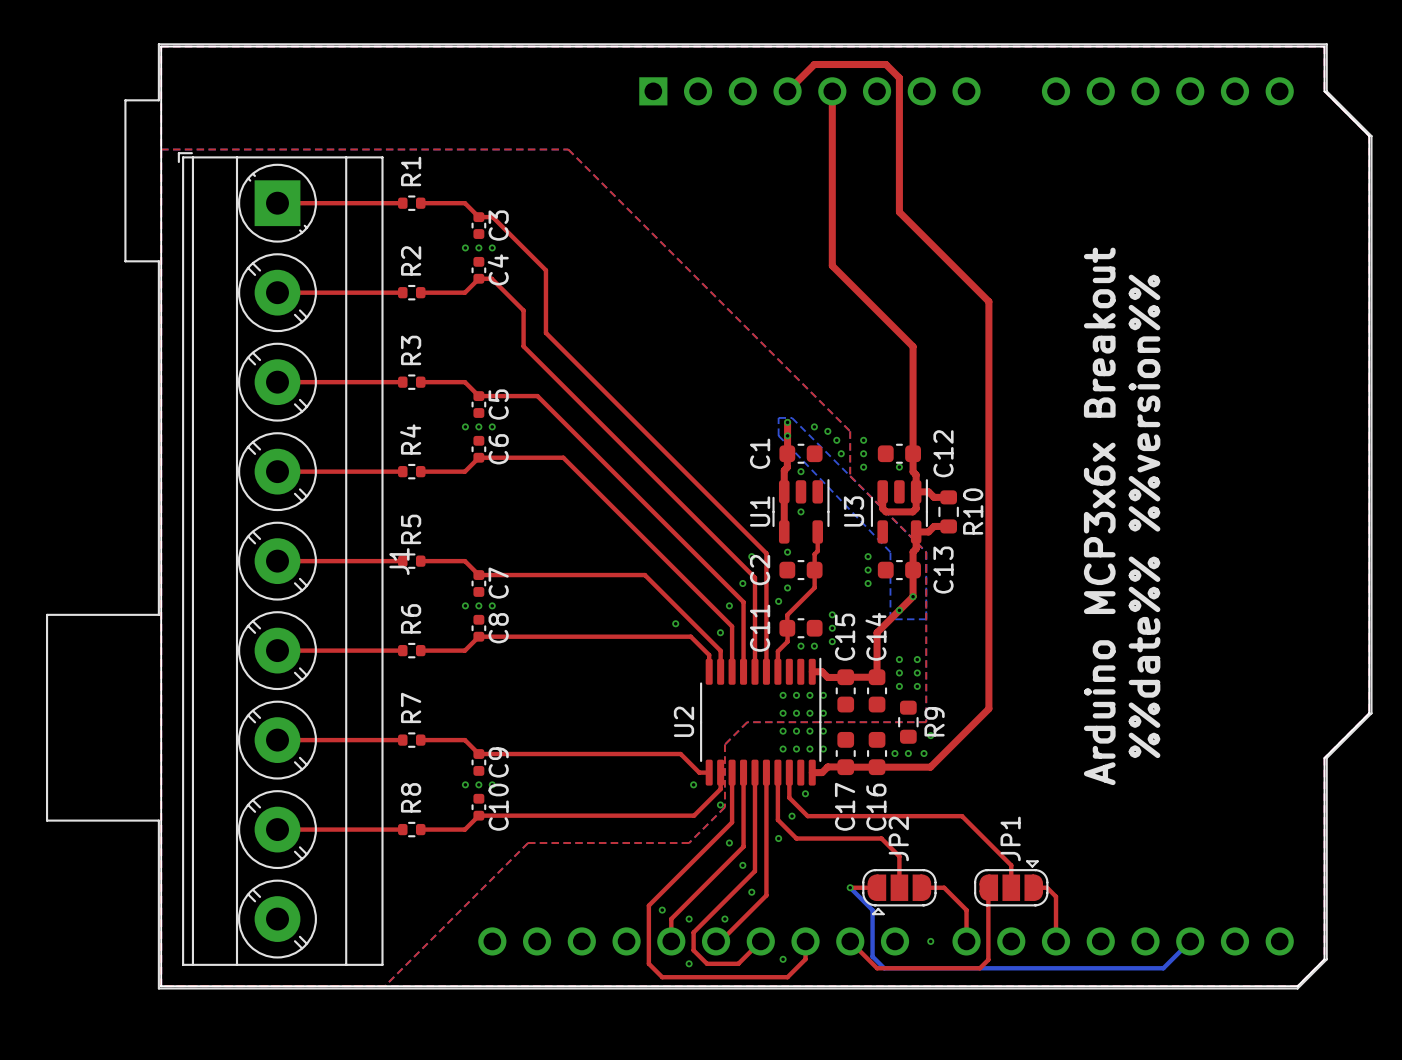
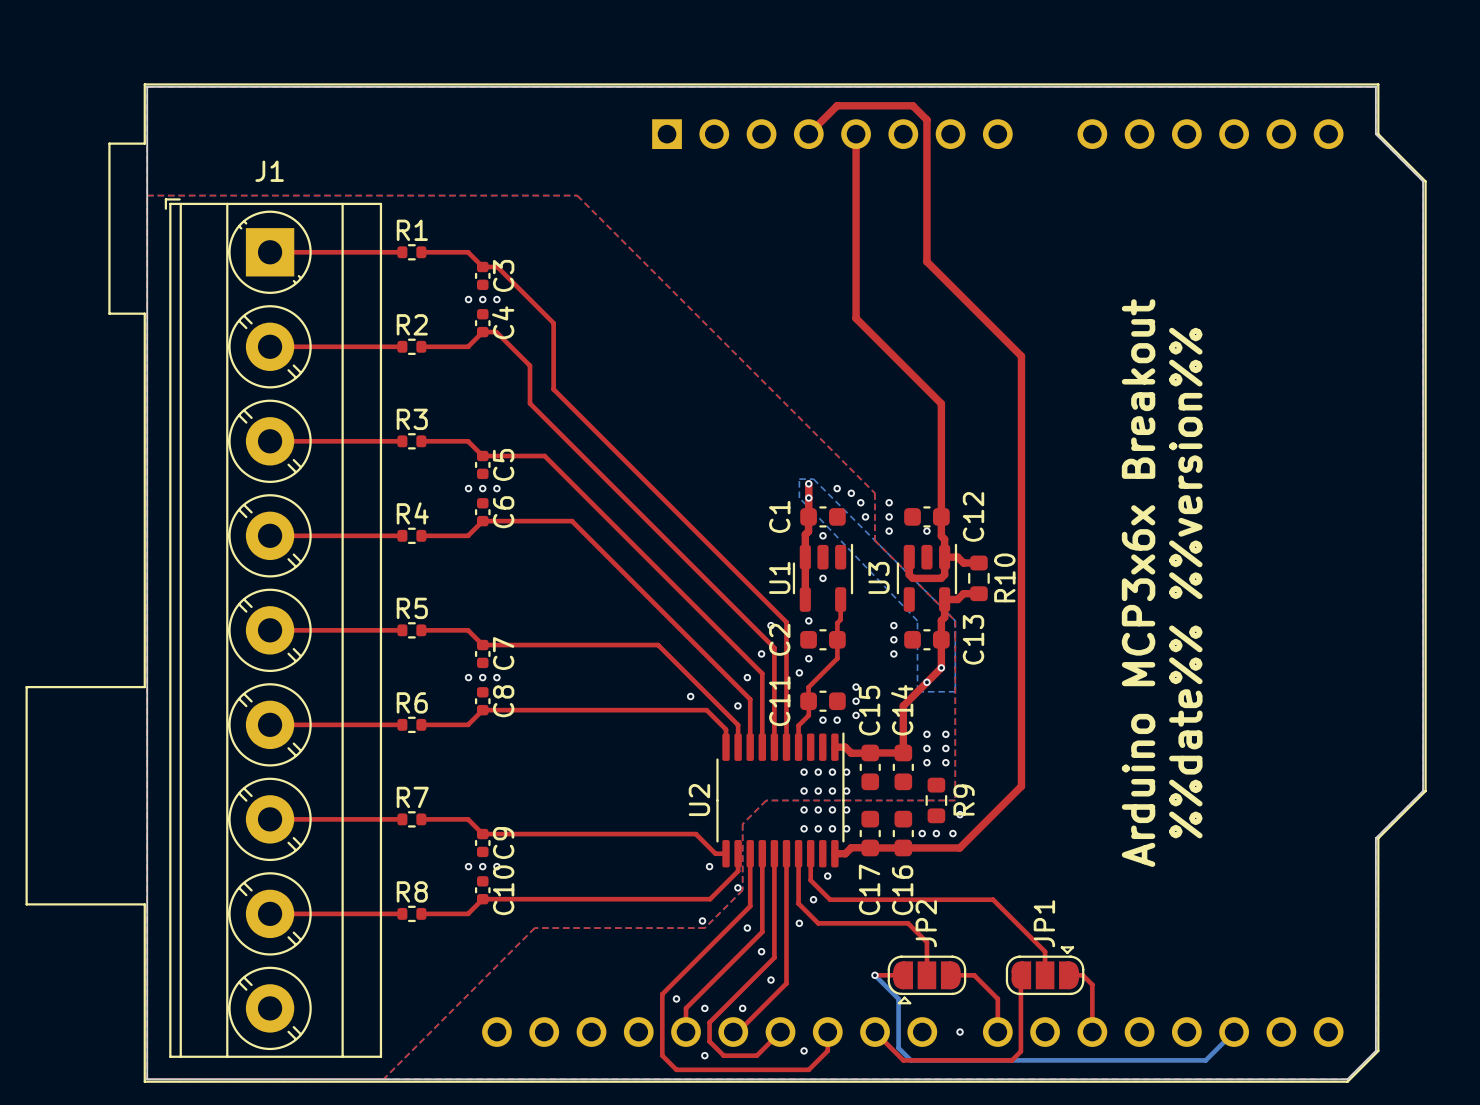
R1 name rotation: 0° (411, 171) -> 90° clockwise (412, 230)
R2 name rotation: 0° (411, 260) -> 90° clockwise (412, 324)
R3 name rotation: 0° (411, 350) -> 90° clockwise (412, 419)
R4 name rotation: 0° (410, 439) -> 90° clockwise (412, 513)
R5 name rotation: 0° (411, 529) -> 90° clockwise (412, 608)
J1 name rotation: 0° (399, 561) -> 90° clockwise (269, 171)
J1 name position: J1 (399, 561) -> J1 (269, 171)
R6 name rotation: 0° (411, 618) -> 90° clockwise (412, 702)
R7 name rotation: 0° (411, 707) -> 90° clockwise (412, 797)
R8 name rotation: 0° (411, 797) -> 90° clockwise (412, 891)
via: none -> (702, 920)

